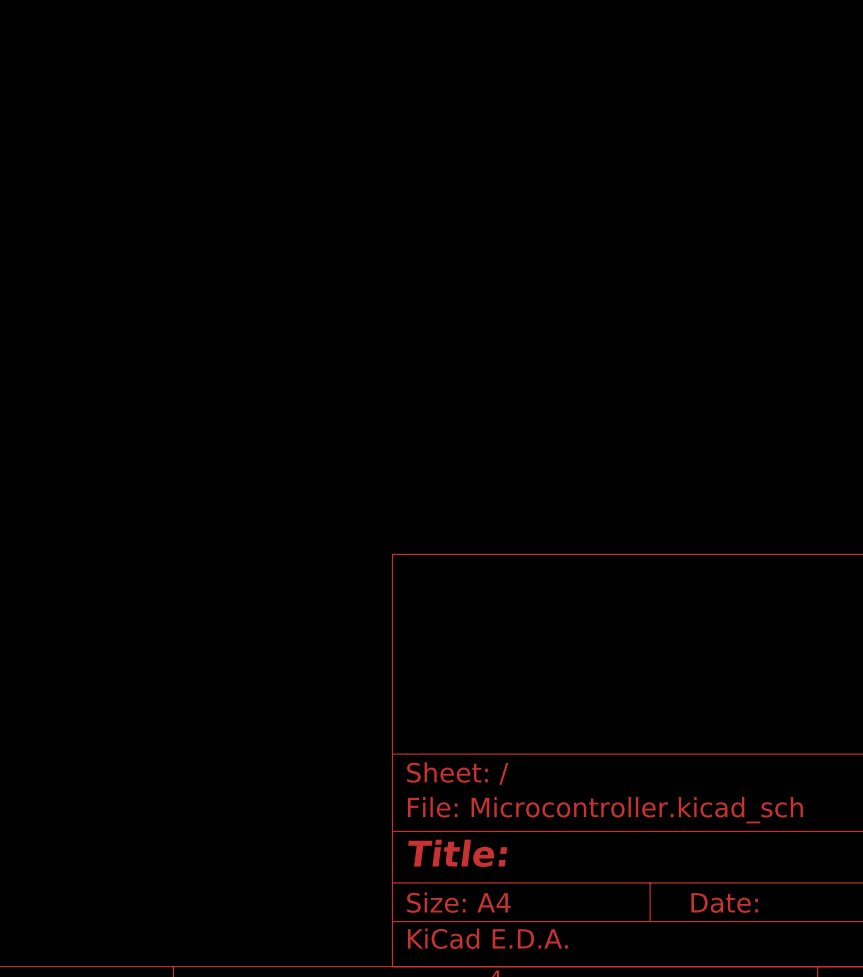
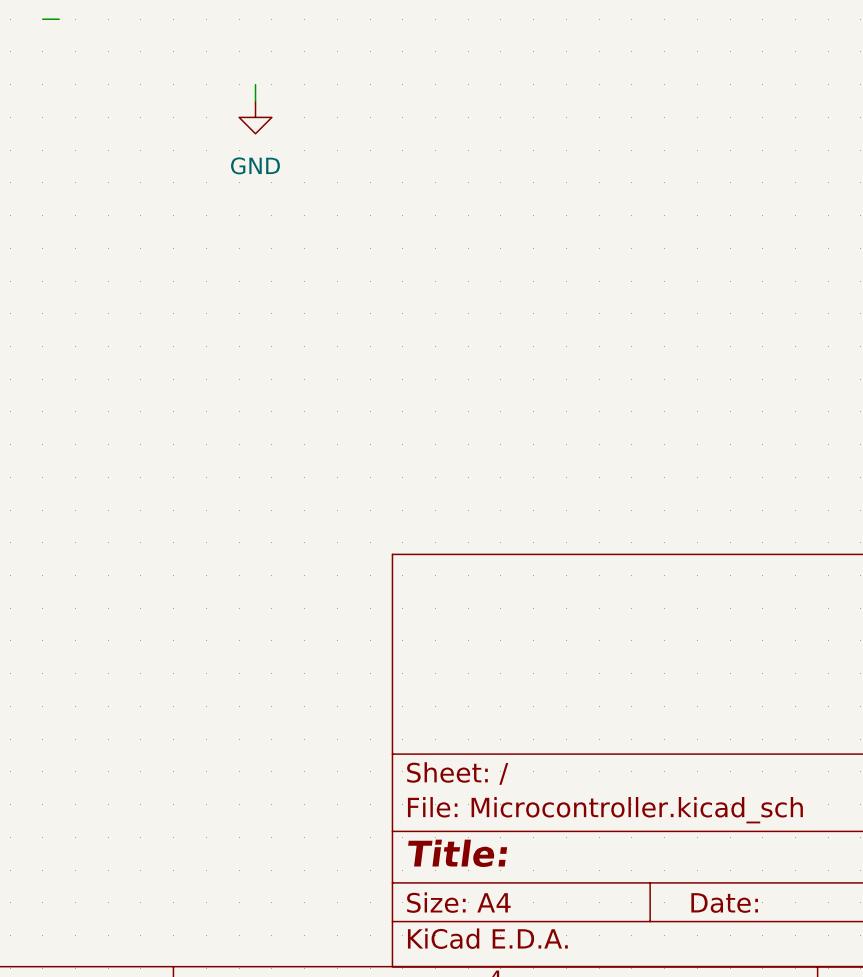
wire: none -> (42, 19) (59, 19)
wire: none -> (255, 84) (255, 101)
power symbol: none -> GND (255, 117)

